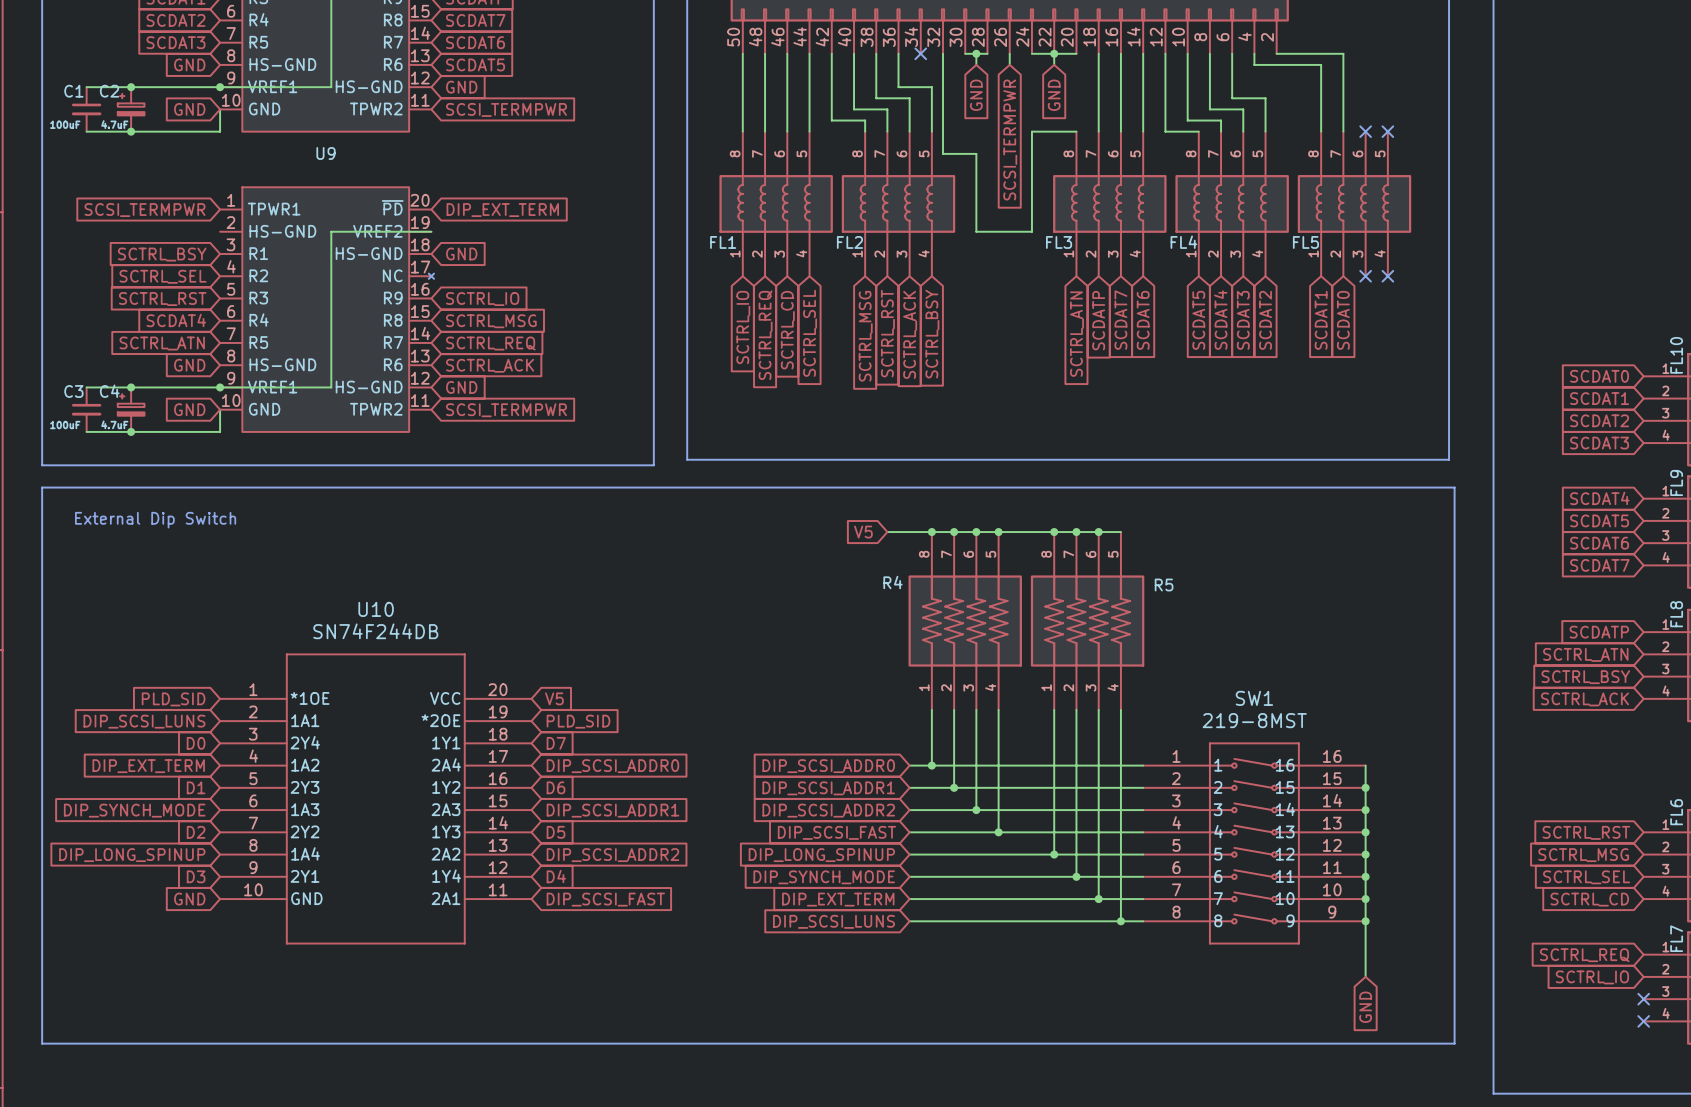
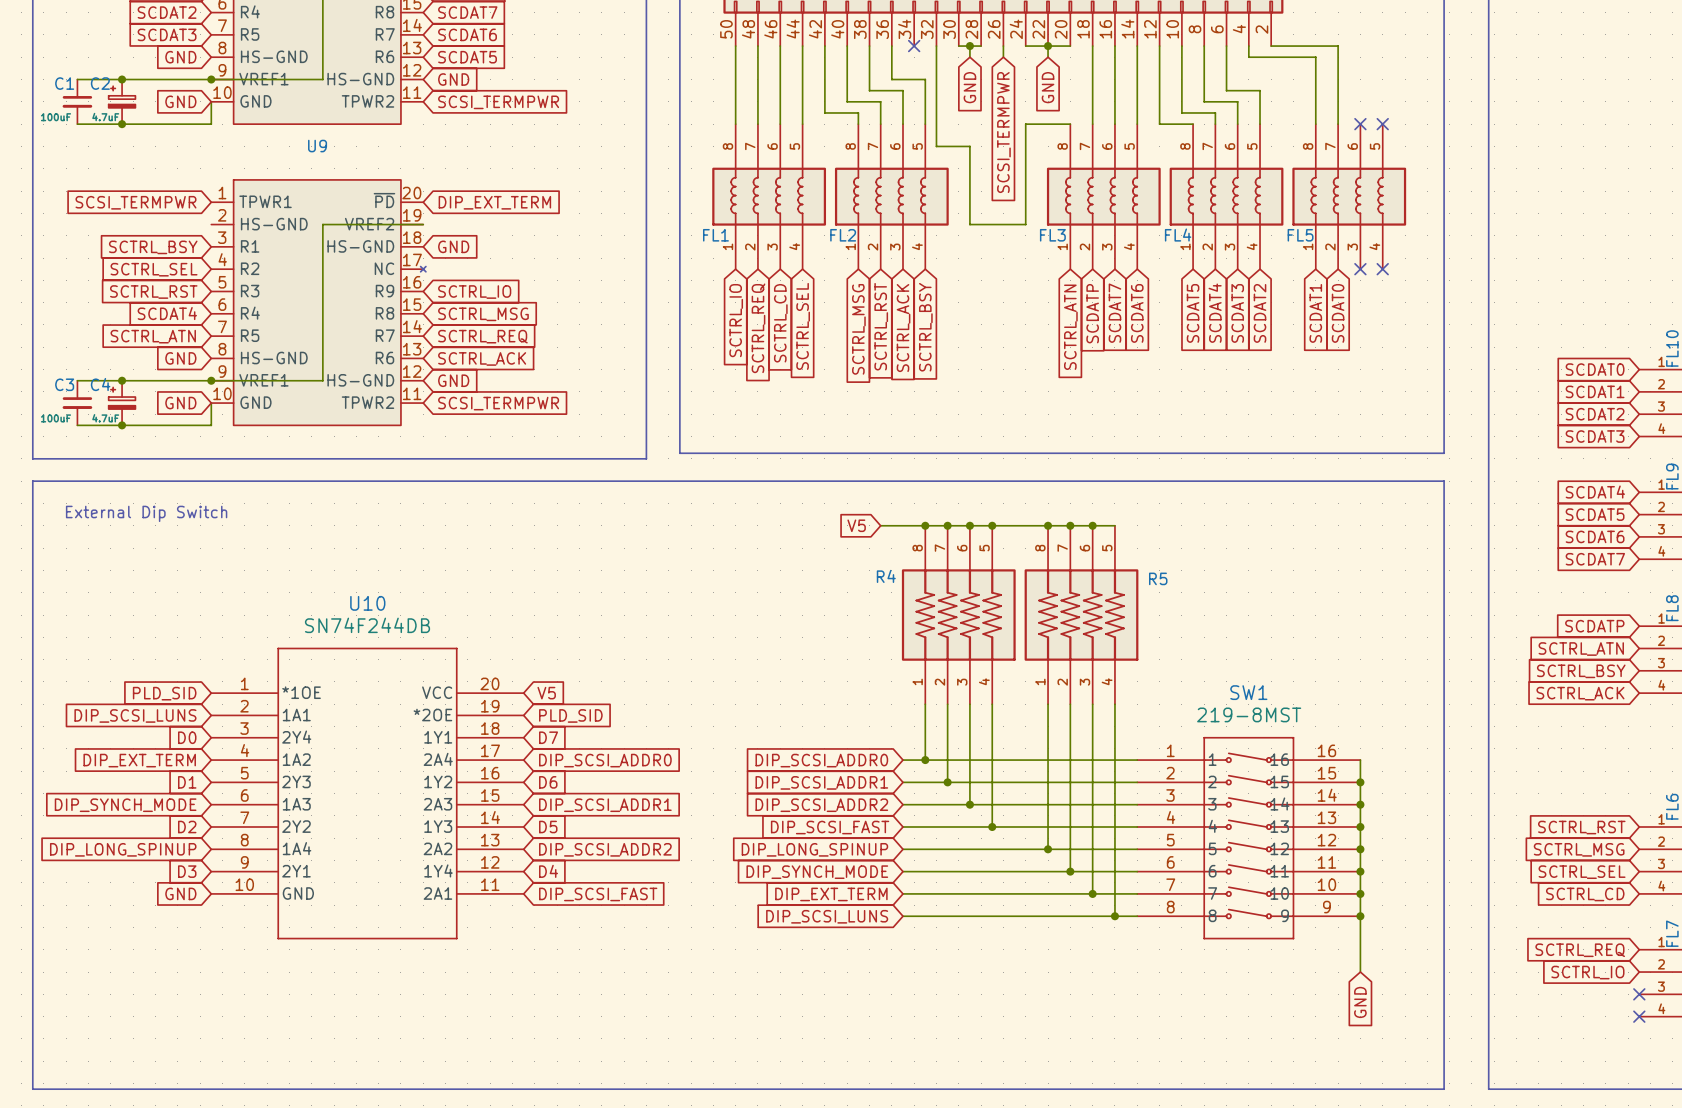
line: (1449, 487) (1454, 487) (1454, 1043) (42, 1043) -> (1444, 481) (1444, 1089) (32, 1089) (32, 1038)

